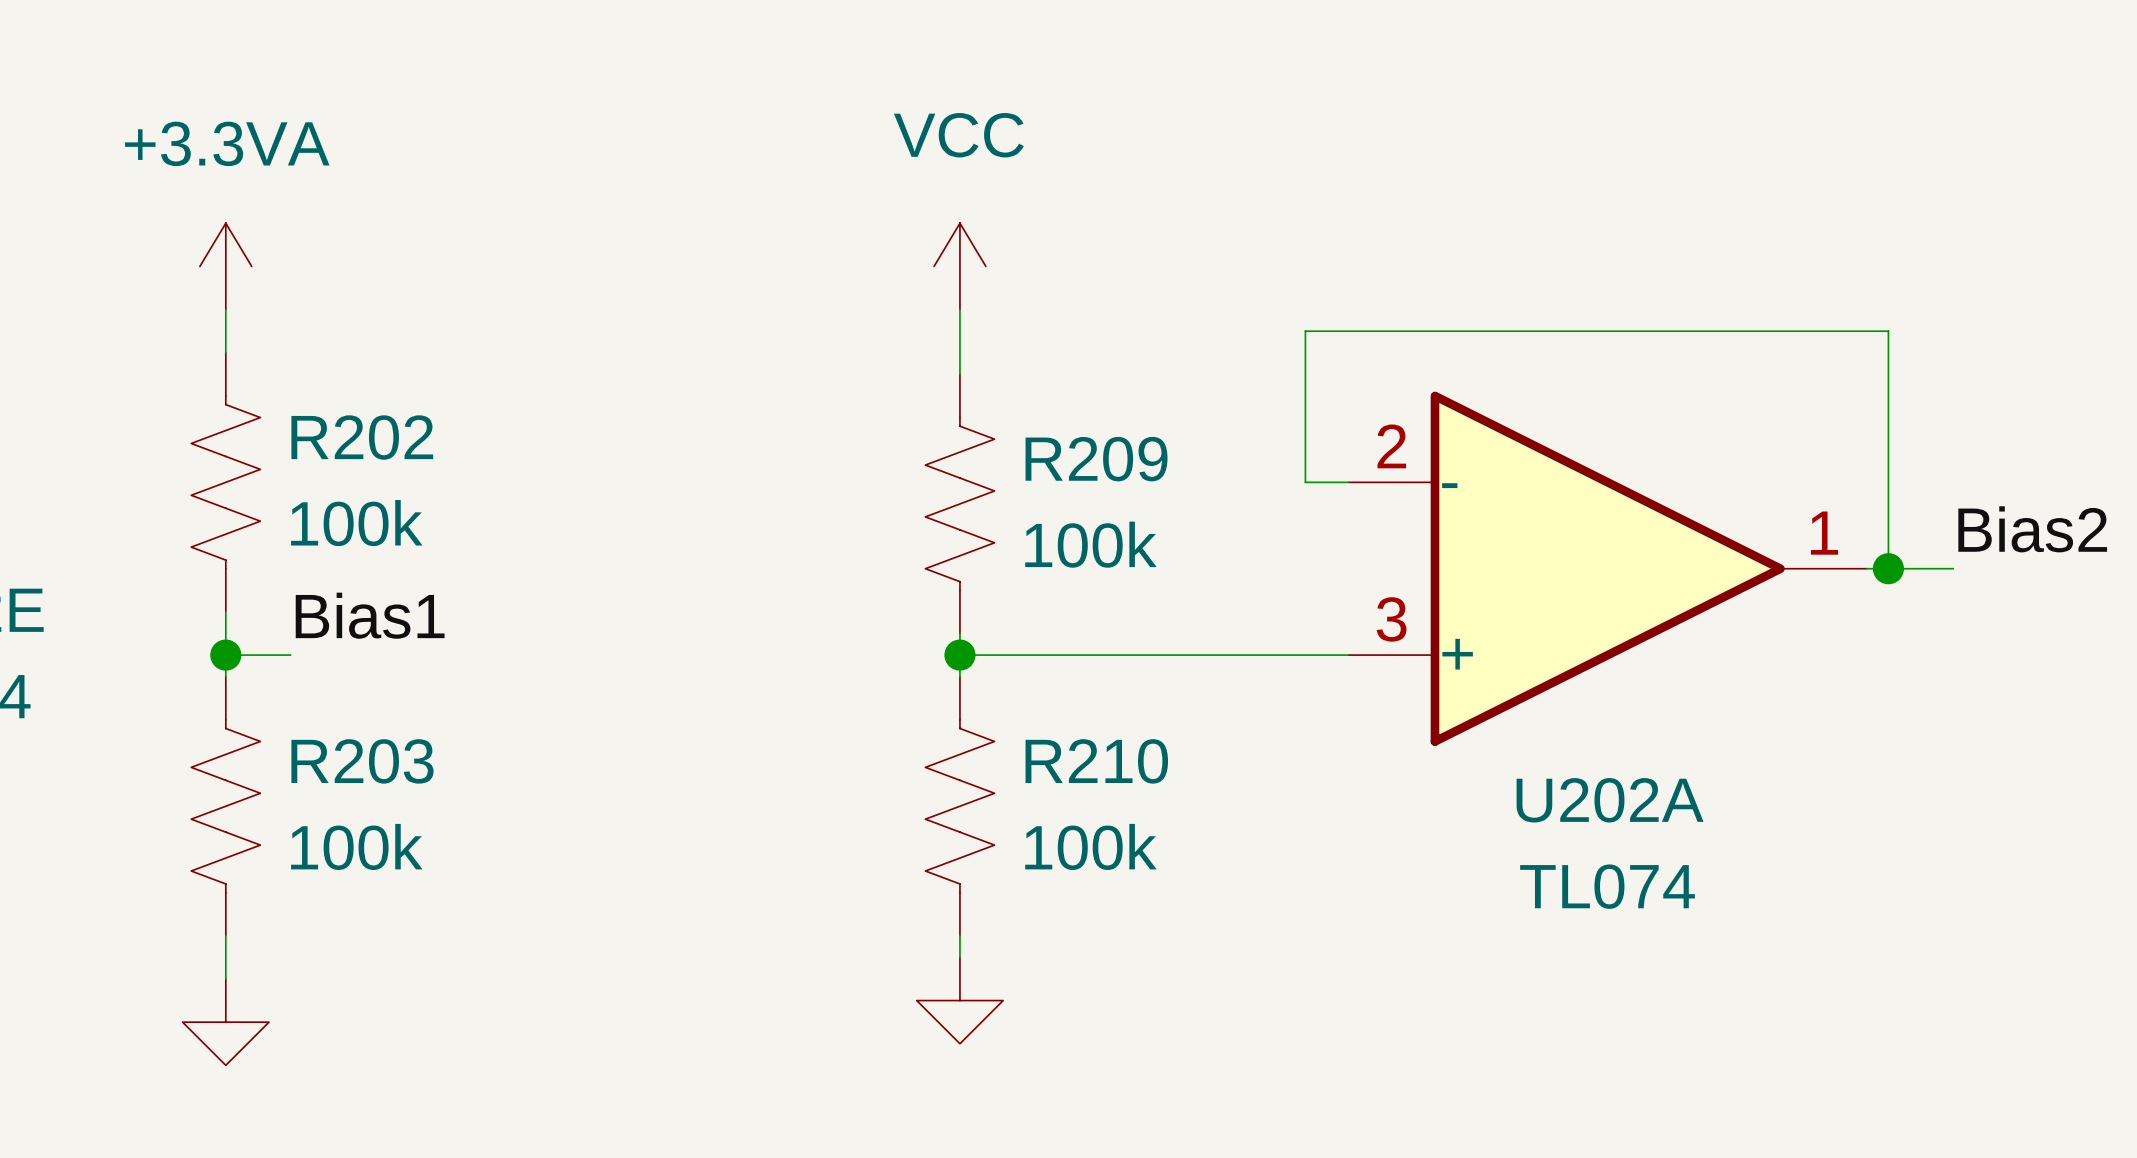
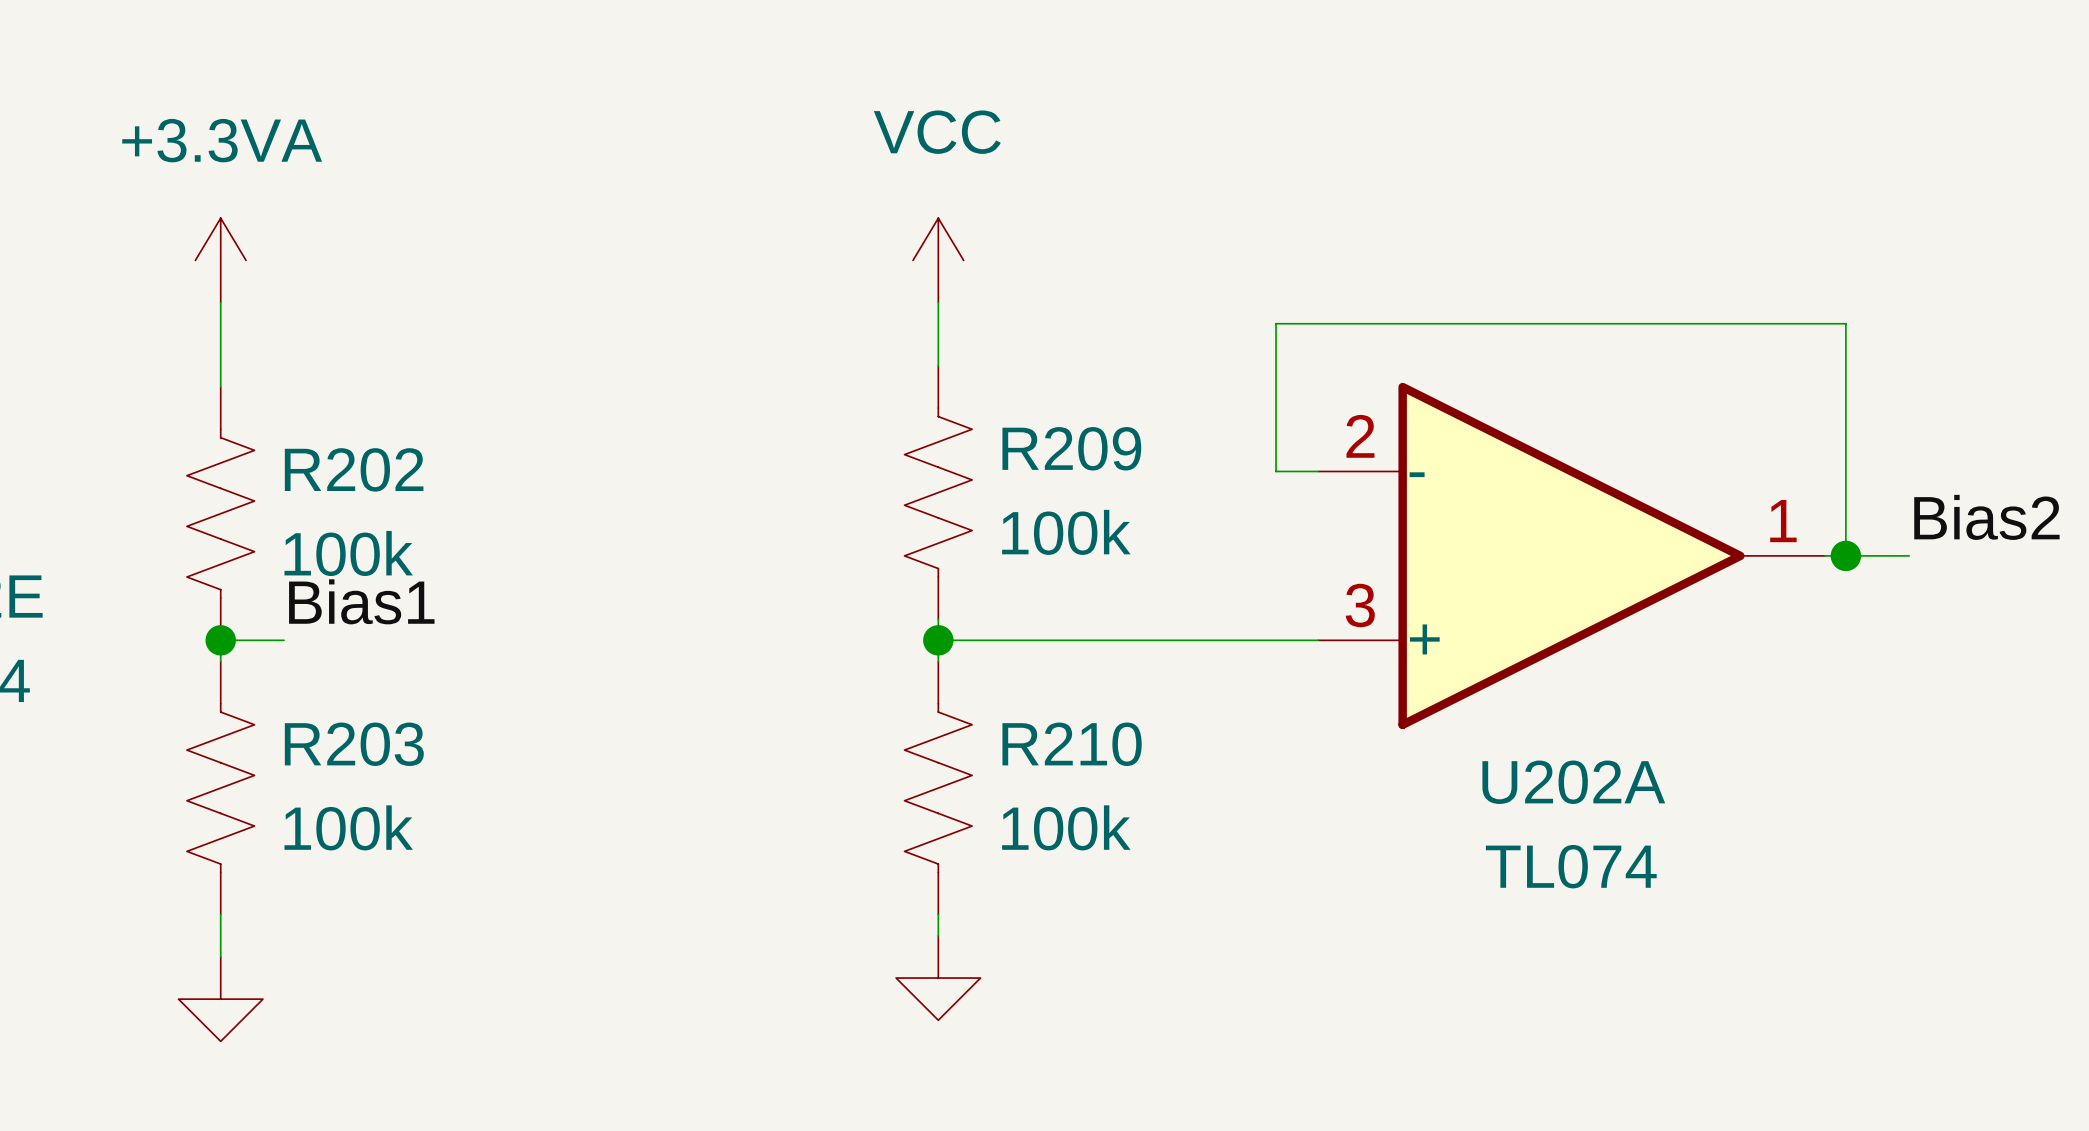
R202 position: (225, 482) -> (220, 513)

